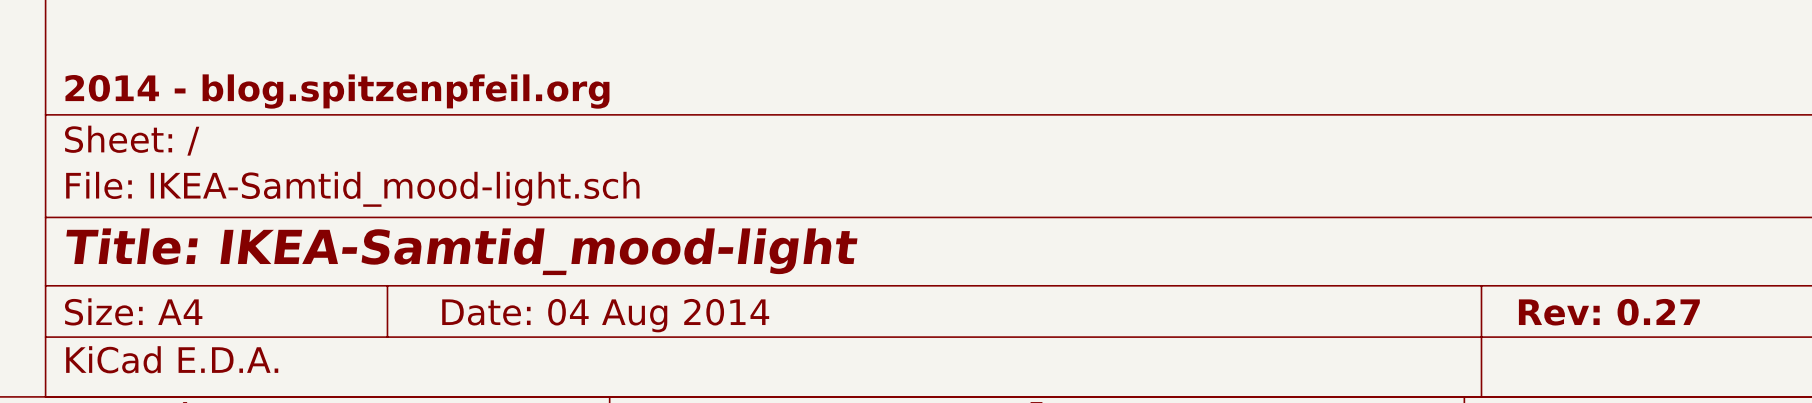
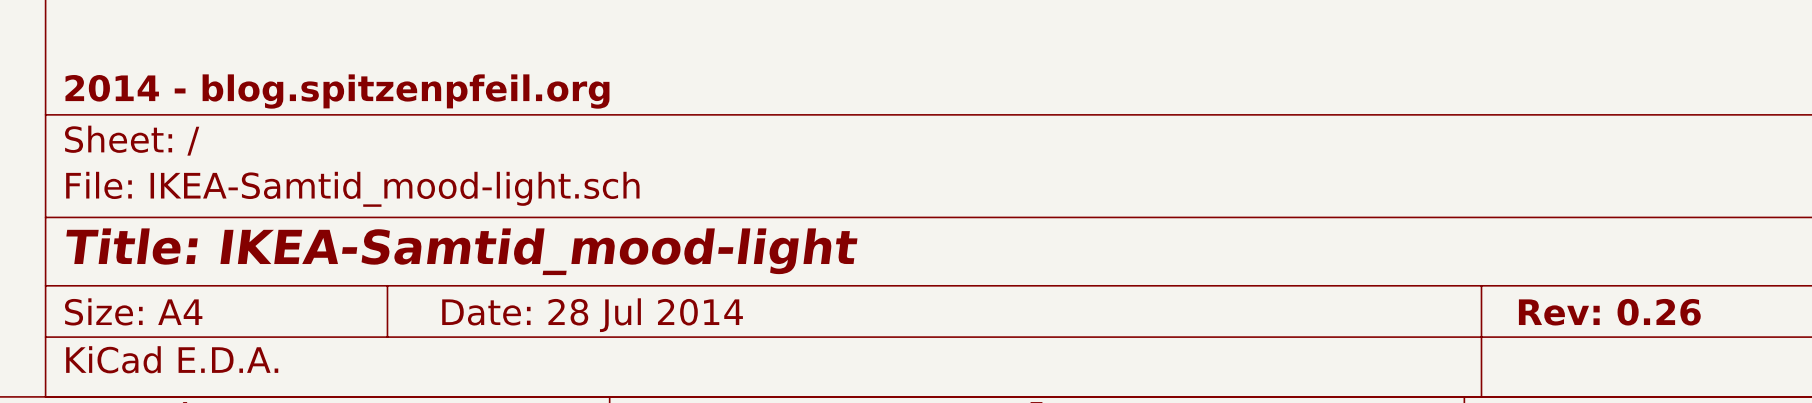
title block: Rev: 0.27 (1609, 312) -> Rev: 0.26 (1609, 312)
title block: Date: 04 Aug 2014 (605, 315) -> Date: 28 Jul 2014 (592, 315)

